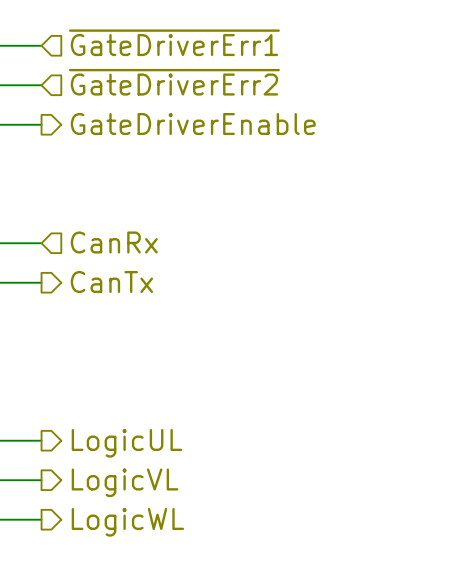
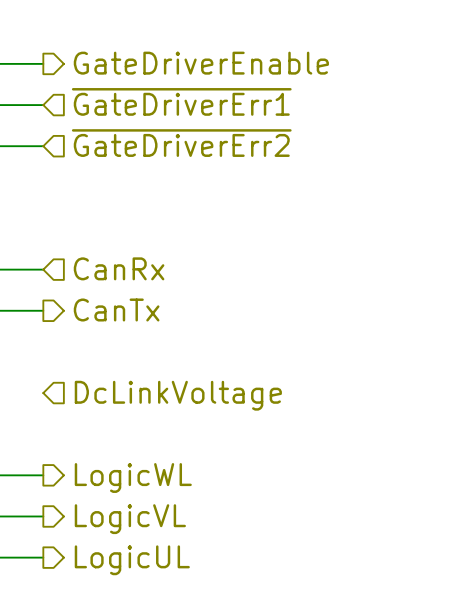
hierarchical label shape: input (174, 42) -> output (201, 63)
hierarchical label: ~{GateDriverErr1} (174, 42) -> GateDriverEnable (201, 63)
hierarchical label: ~{GateDriverErr2} (174, 82) -> ~{GateDriverErr1} (181, 101)
hierarchical label shape: output (193, 124) -> input (181, 143)
hierarchical label: GateDriverEnable (193, 124) -> ~{GateDriverErr2} (181, 143)
hierarchical label: none -> DcLinkVoltage (178, 395)
hierarchical label: LogicUL (126, 443) -> LogicWL (133, 478)
hierarchical label: LogicWL (127, 522) -> LogicUL (132, 560)

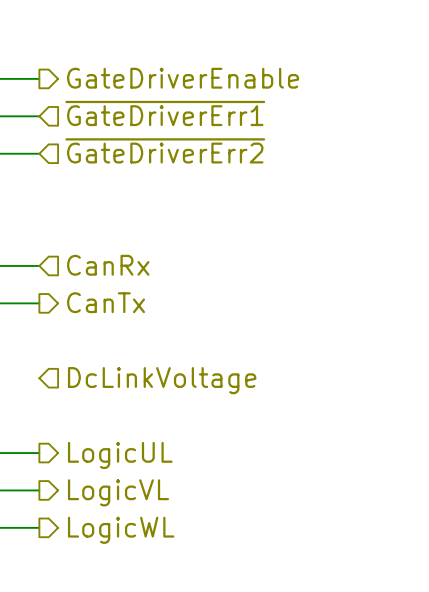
hierarchical label: LogicWL (133, 478) -> LogicUL (120, 455)
hierarchical label: LogicUL (132, 560) -> LogicWL (121, 530)

